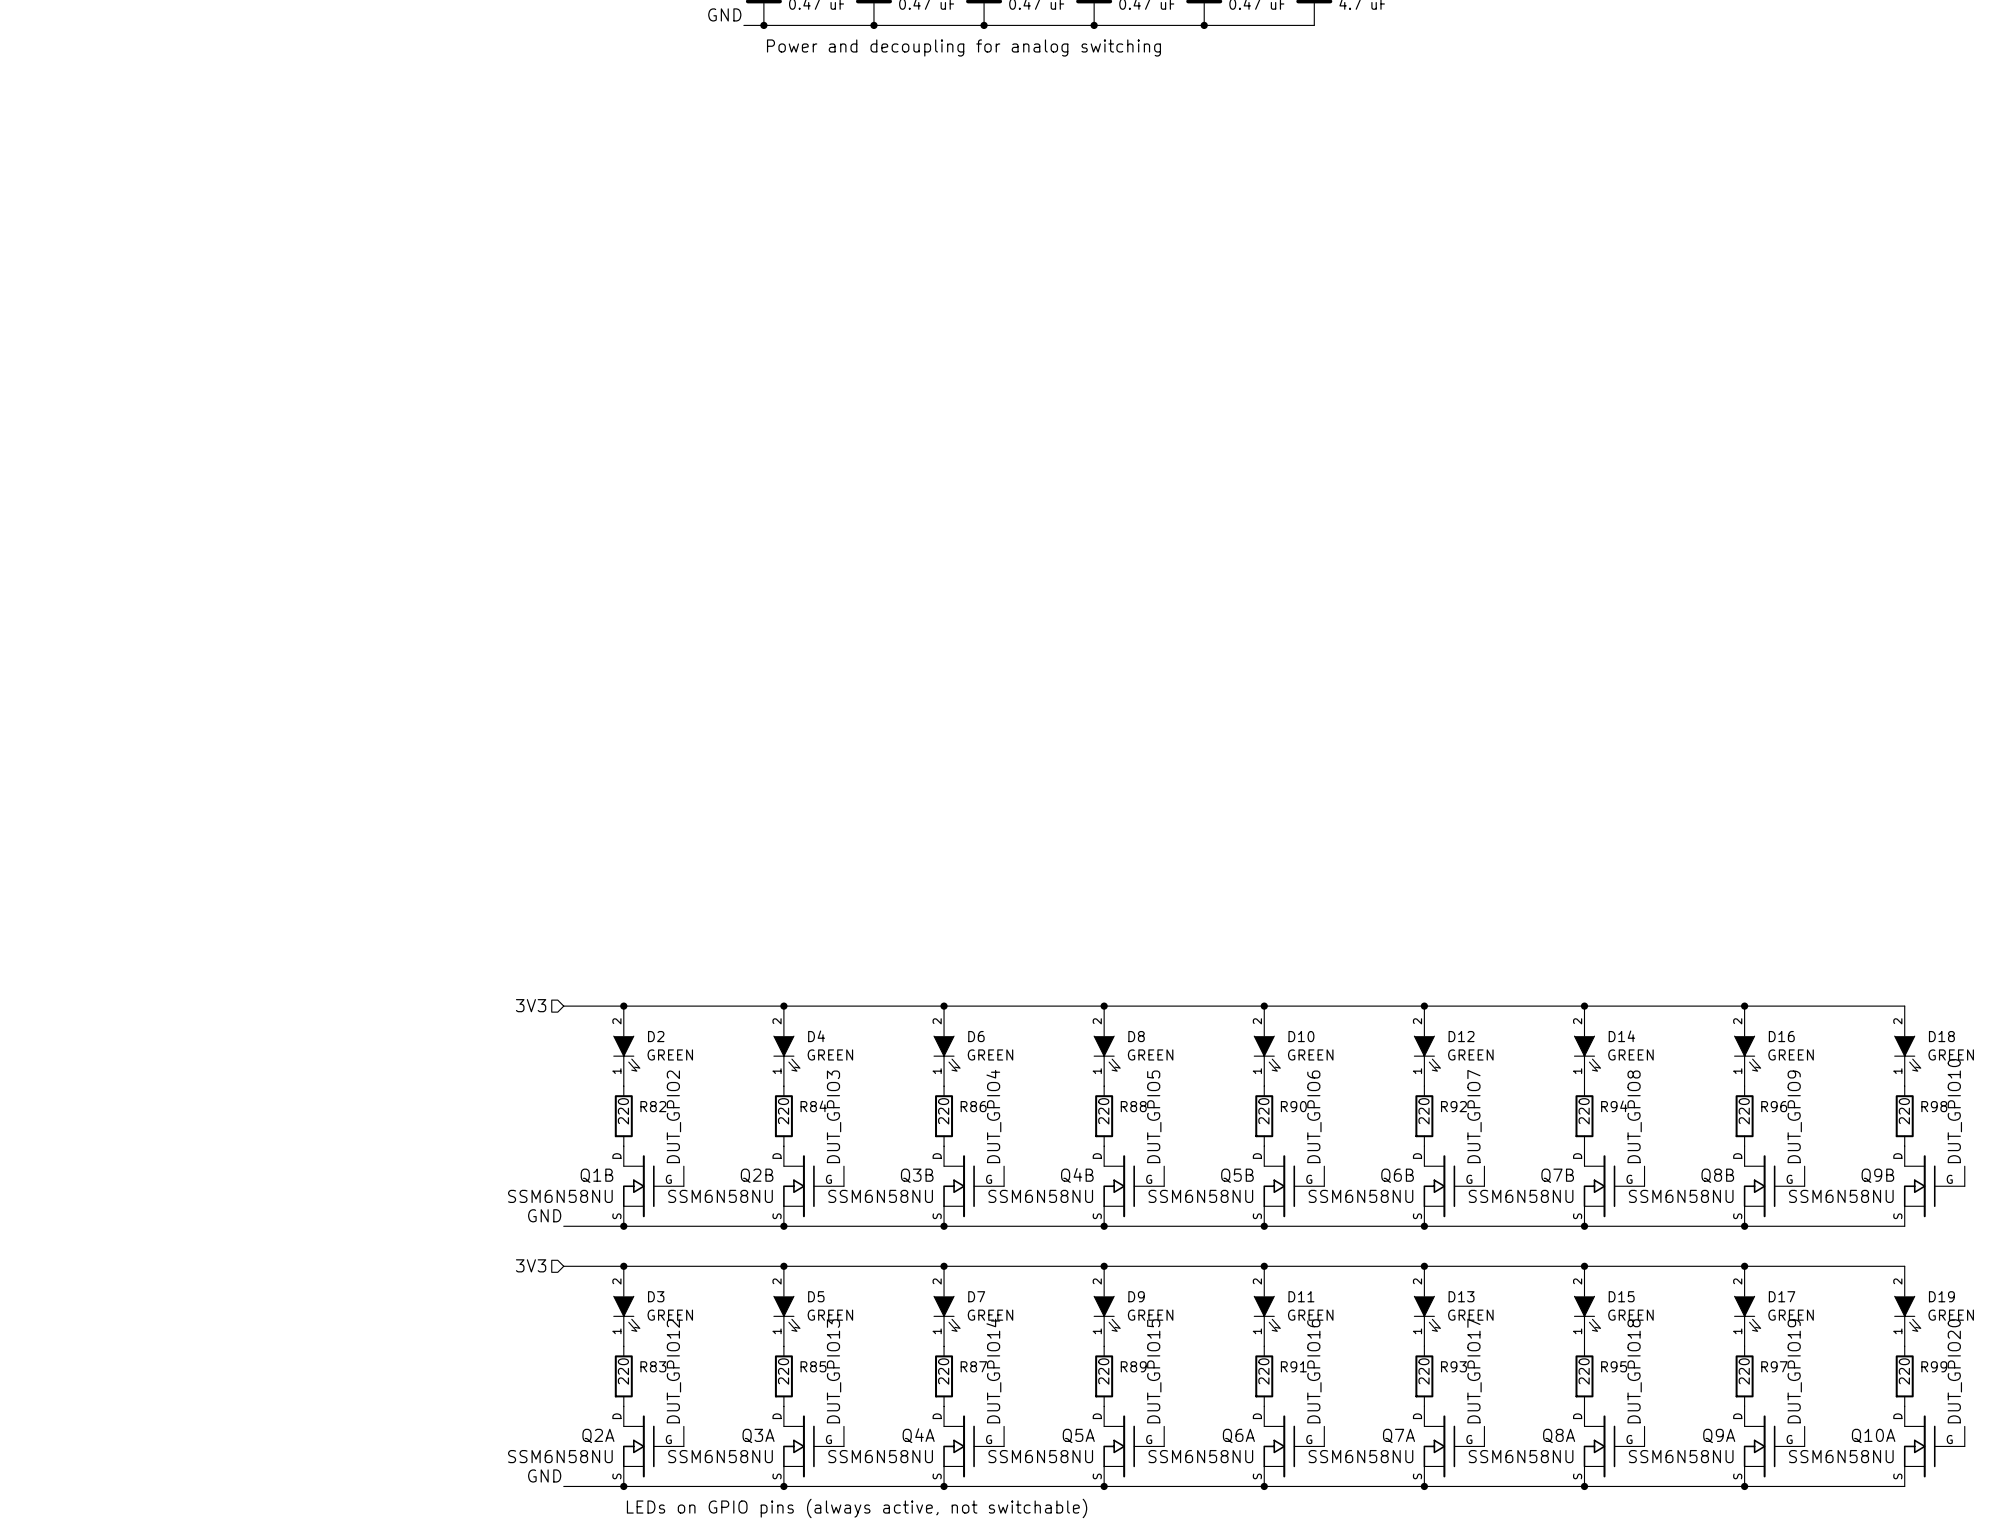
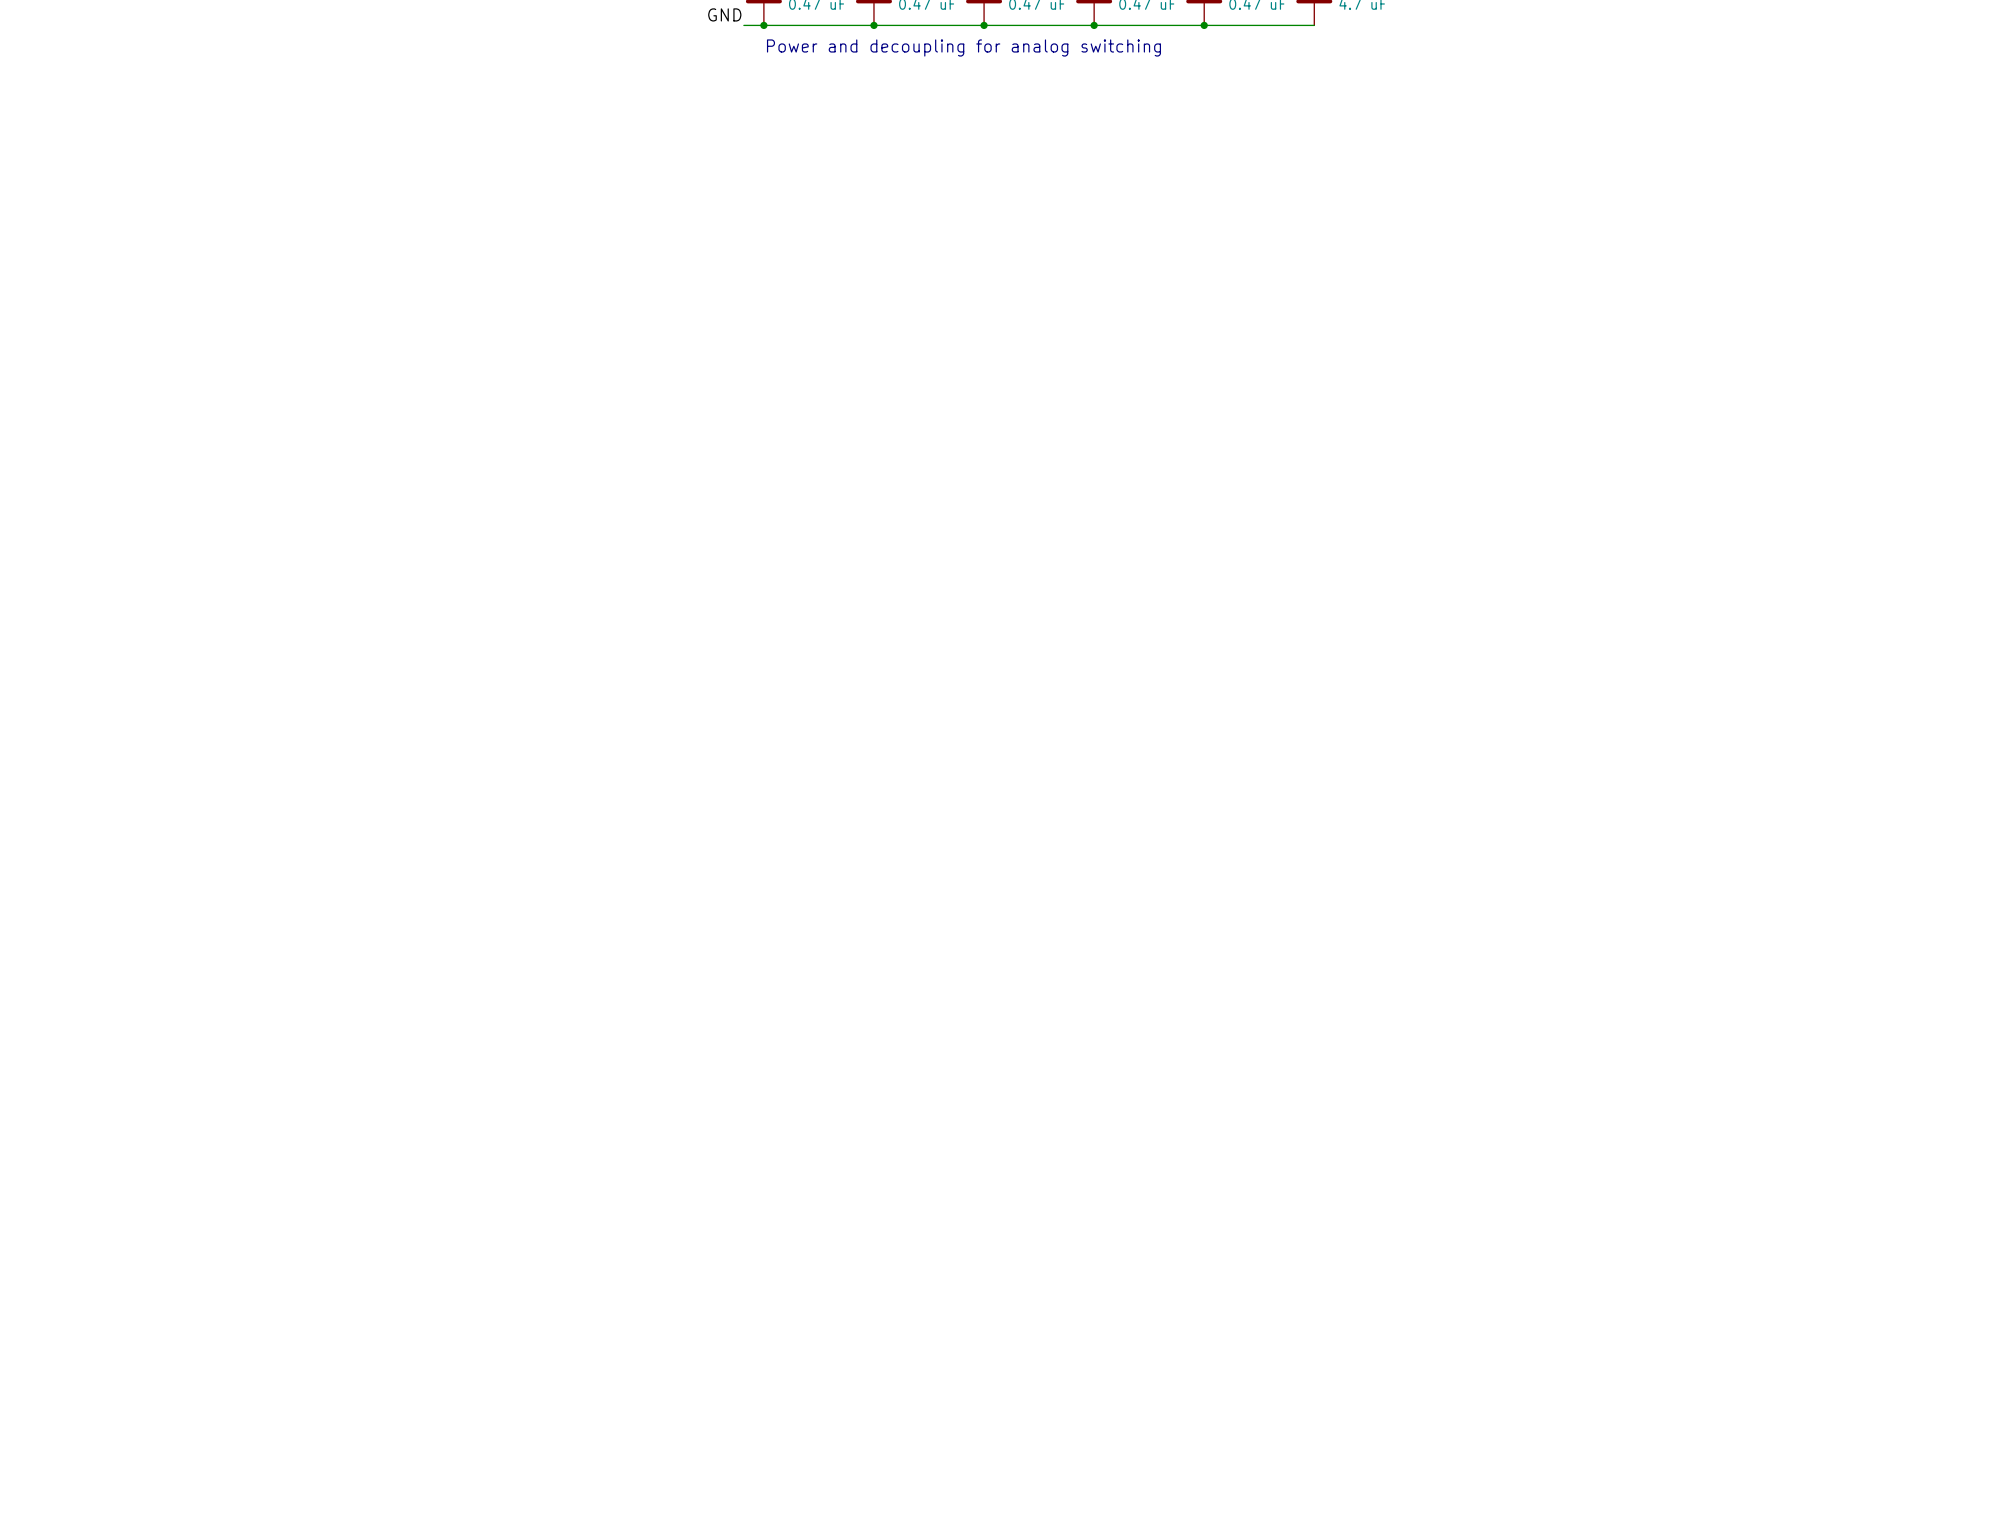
hierarchical label: 3V3 (531, 1005) -> none
wire: (563, 1006) (1904, 1006) -> none
junction: (623, 1006) -> none
junction: (783, 1006) -> none
junction: (944, 1006) -> none
junction: (1104, 1006) -> none
junction: (1264, 1006) -> none
junction: (1424, 1006) -> none
junction: (1584, 1006) -> none
junction: (1744, 1006) -> none
D2: GREEN (626, 1046) -> none
D4: GREEN (786, 1046) -> none
D6: GREEN (947, 1046) -> none
D8: GREEN (1107, 1046) -> none
D10: GREEN (1267, 1046) -> none
D12: GREEN (1427, 1046) -> none
D14: GREEN (1587, 1046) -> none
D16: GREEN (1747, 1046) -> none
D18: GREEN (1907, 1046) -> none
label: DUT_GPIO10 (1954, 1111) -> none
R82: 220 (623, 1116) -> none
label: DUT_GPIO2 (673, 1116) -> none
R84: 220 (783, 1116) -> none
label: DUT_GPIO3 (834, 1116) -> none
R86: 220 (944, 1116) -> none
label: DUT_GPIO4 (993, 1116) -> none
R88: 220 (1104, 1116) -> none
label: DUT_GPIO5 (1154, 1116) -> none
R90: 220 (1264, 1116) -> none
label: DUT_GPIO6 (1314, 1116) -> none
R92: 220 (1424, 1116) -> none
label: DUT_GPIO7 (1474, 1116) -> none
R94: 220 (1584, 1116) -> none
label: DUT_GPIO8 (1634, 1116) -> none
R96: 220 (1744, 1116) -> none
label: DUT_GPIO9 (1794, 1116) -> none
R98: 220 (1904, 1116) -> none
wire: (683, 1166) (683, 1186) -> none
wire: (843, 1166) (843, 1186) -> none
wire: (1004, 1166) (1004, 1186) -> none
wire: (1164, 1166) (1164, 1186) -> none
wire: (1324, 1166) (1324, 1186) -> none
wire: (1484, 1166) (1484, 1186) -> none
wire: (1644, 1166) (1644, 1186) -> none
wire: (1804, 1166) (1804, 1186) -> none
wire: (1964, 1166) (1964, 1186) -> none
Q1B: SSM6N58NU (653, 1186) -> none
Q2B: SSM6N58NU (813, 1186) -> none
Q3B: SSM6N58NU (973, 1186) -> none
Q4B: SSM6N58NU (1133, 1186) -> none
Q5B: SSM6N58NU (1293, 1186) -> none
Q6B: SSM6N58NU (1453, 1186) -> none
Q7B: SSM6N58NU (1614, 1186) -> none
Q8B: SSM6N58NU (1774, 1186) -> none
Q9B: SSM6N58NU (1934, 1186) -> none
label: GND (544, 1215) -> none
wire: (563, 1226) (1904, 1226) -> none
junction: (623, 1226) -> none
junction: (783, 1226) -> none
junction: (944, 1226) -> none
junction: (1104, 1226) -> none
junction: (1264, 1226) -> none
junction: (1424, 1226) -> none
junction: (1584, 1226) -> none
junction: (1744, 1226) -> none
hierarchical label: 3V3 (531, 1265) -> none
wire: (563, 1266) (1904, 1266) -> none
junction: (623, 1266) -> none
junction: (783, 1266) -> none
junction: (944, 1266) -> none
junction: (1104, 1266) -> none
junction: (1264, 1266) -> none
junction: (1424, 1266) -> none
junction: (1584, 1266) -> none
junction: (1744, 1266) -> none
D3: GREEN (626, 1306) -> none
D5: GREEN (786, 1306) -> none
D7: GREEN (947, 1306) -> none
D9: GREEN (1107, 1306) -> none
D11: GREEN (1267, 1306) -> none
D13: GREEN (1427, 1306) -> none
D15: GREEN (1587, 1306) -> none
D17: GREEN (1747, 1306) -> none
D19: GREEN (1907, 1306) -> none
label: DUT_GPIO12 (673, 1371) -> none
label: DUT_GPIO13 (834, 1371) -> none
label: DUT_GPIO14 (993, 1371) -> none
label: DUT_GPIO15 (1154, 1371) -> none
label: DUT_GPIO16 (1314, 1371) -> none
label: DUT_GPIO17 (1474, 1371) -> none
label: DUT_GPIO18 (1634, 1371) -> none
label: DUT_GPIO19 (1794, 1371) -> none
label: DUT_GPIO20 (1954, 1371) -> none
R83: 220 (623, 1376) -> none
R85: 220 (783, 1376) -> none
R87: 220 (944, 1376) -> none
R89: 220 (1104, 1376) -> none
R91: 220 (1264, 1376) -> none
R93: 220 (1424, 1376) -> none
R95: 220 (1584, 1376) -> none
R97: 220 (1744, 1376) -> none
R99: 220 (1904, 1376) -> none
wire: (683, 1426) (683, 1446) -> none
wire: (843, 1426) (843, 1446) -> none
wire: (1004, 1426) (1004, 1446) -> none
wire: (1164, 1426) (1164, 1446) -> none
wire: (1324, 1426) (1324, 1446) -> none
wire: (1484, 1426) (1484, 1446) -> none
wire: (1644, 1426) (1644, 1446) -> none
wire: (1804, 1426) (1804, 1446) -> none
wire: (1964, 1426) (1964, 1446) -> none
Q2A: SSM6N58NU (653, 1446) -> none
Q3A: SSM6N58NU (813, 1446) -> none
Q4A: SSM6N58NU (973, 1446) -> none
Q5A: SSM6N58NU (1133, 1446) -> none
Q6A: SSM6N58NU (1293, 1446) -> none
Q7A: SSM6N58NU (1453, 1446) -> none
Q8A: SSM6N58NU (1614, 1446) -> none
Q9A: SSM6N58NU (1774, 1446) -> none
Q10A: SSM6N58NU (1934, 1446) -> none
label: GND (544, 1475) -> none
wire: (563, 1486) (1904, 1486) -> none
junction: (623, 1486) -> none
junction: (783, 1486) -> none
junction: (944, 1486) -> none
junction: (1104, 1486) -> none
junction: (1264, 1486) -> none
junction: (1424, 1486) -> none
junction: (1584, 1486) -> none
junction: (1744, 1486) -> none
text: LEDs on GPIO pins (always active, not switchable) (857, 1508) -> none

